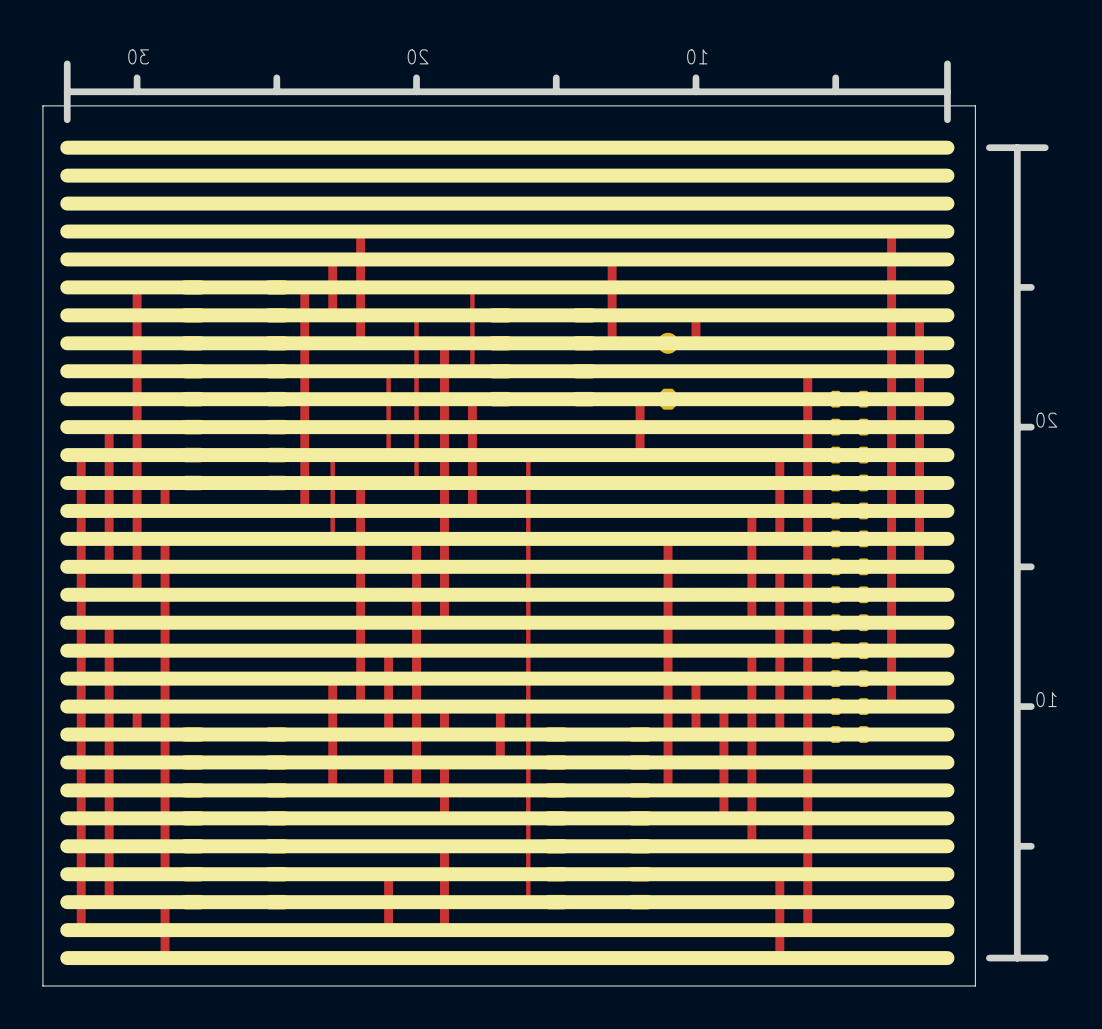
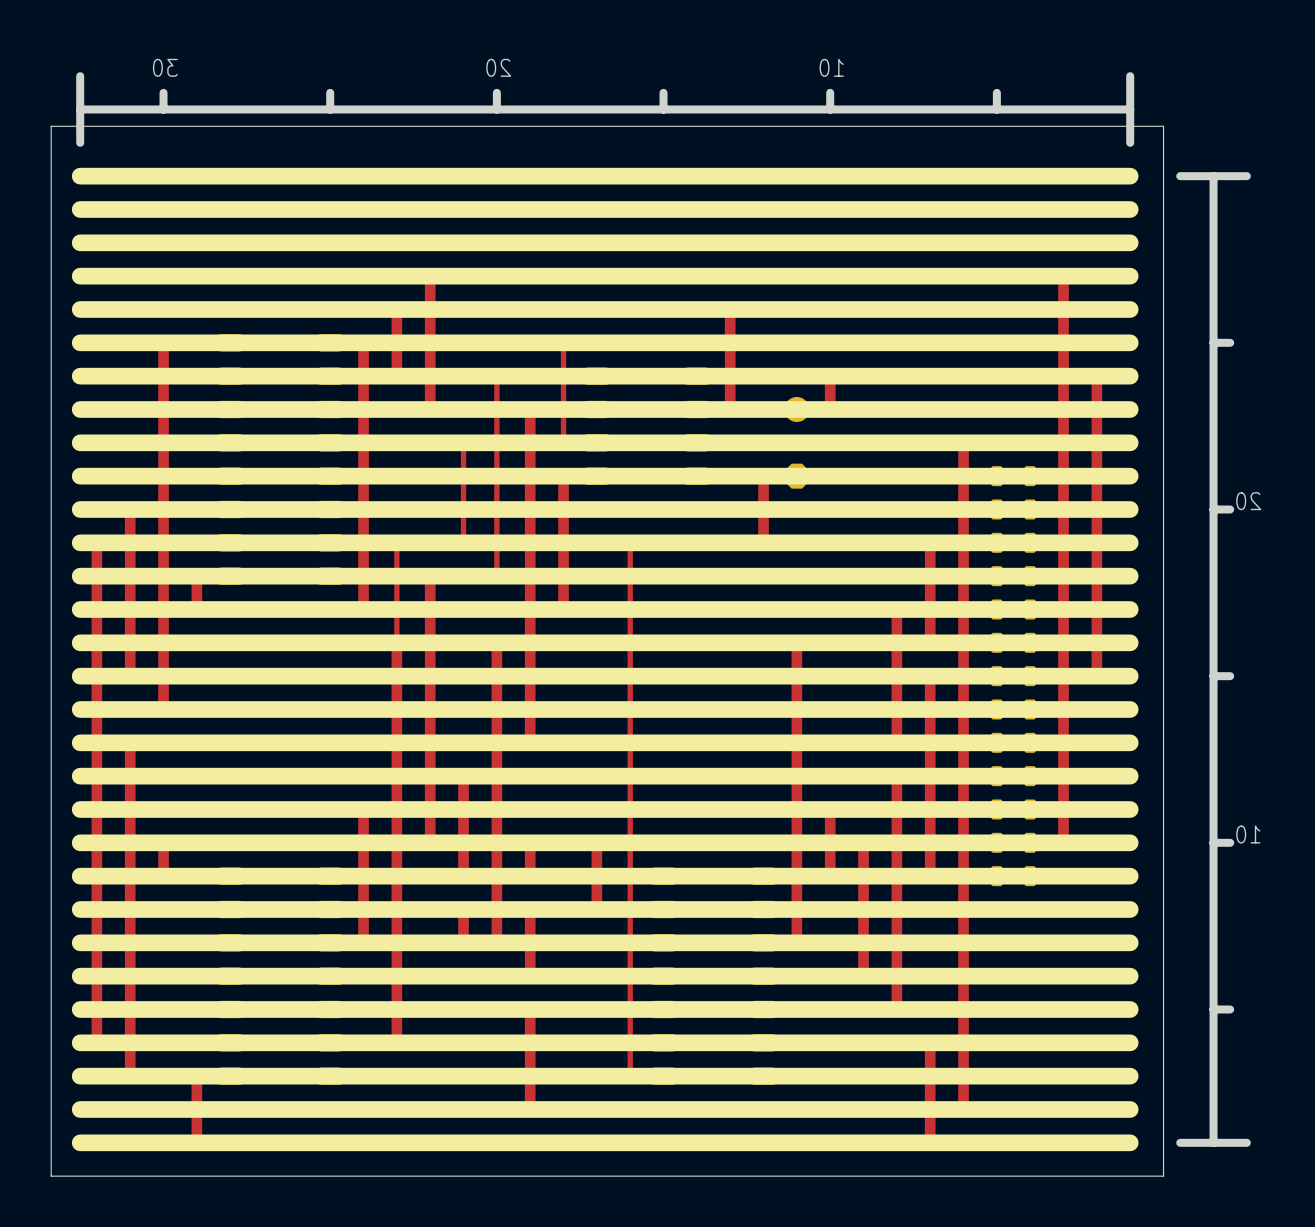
top track: (165, 538) (165, 874) -> none
top track: none -> (396, 642) (396, 809)
top track: none -> (363, 809) (363, 942)
top track: none -> (396, 942) (396, 1042)
top track: (81, 874) (81, 930) -> none
top track: (388, 874) (388, 930) -> none

